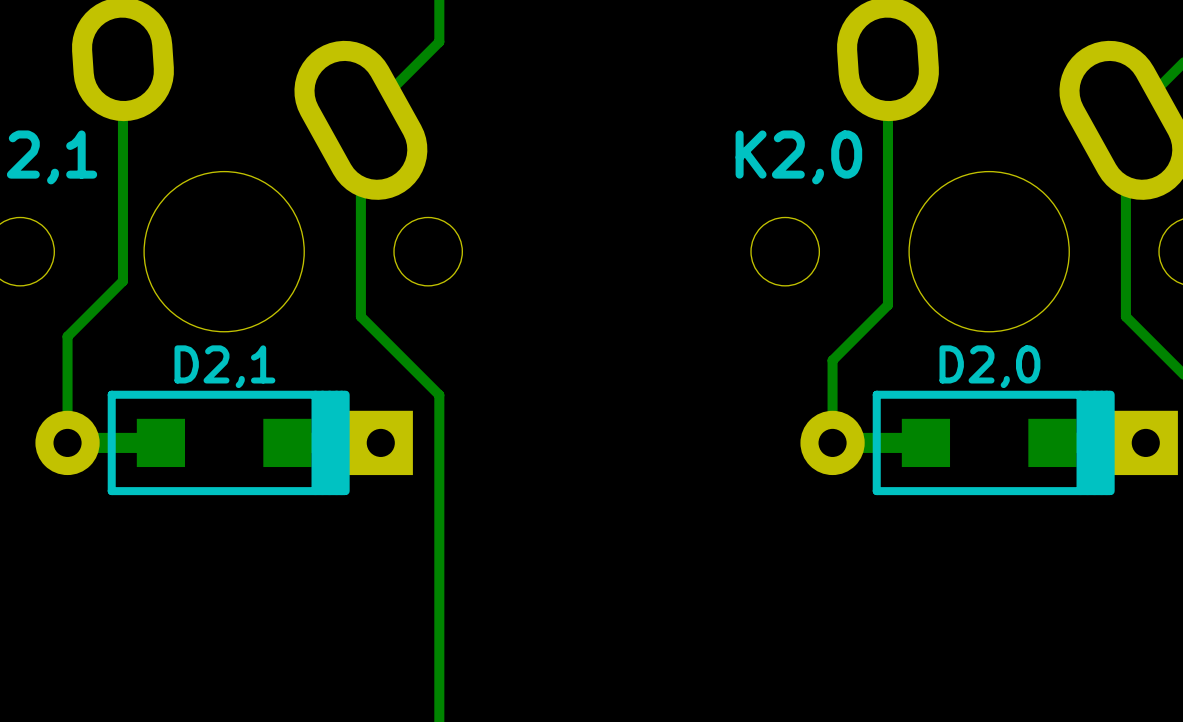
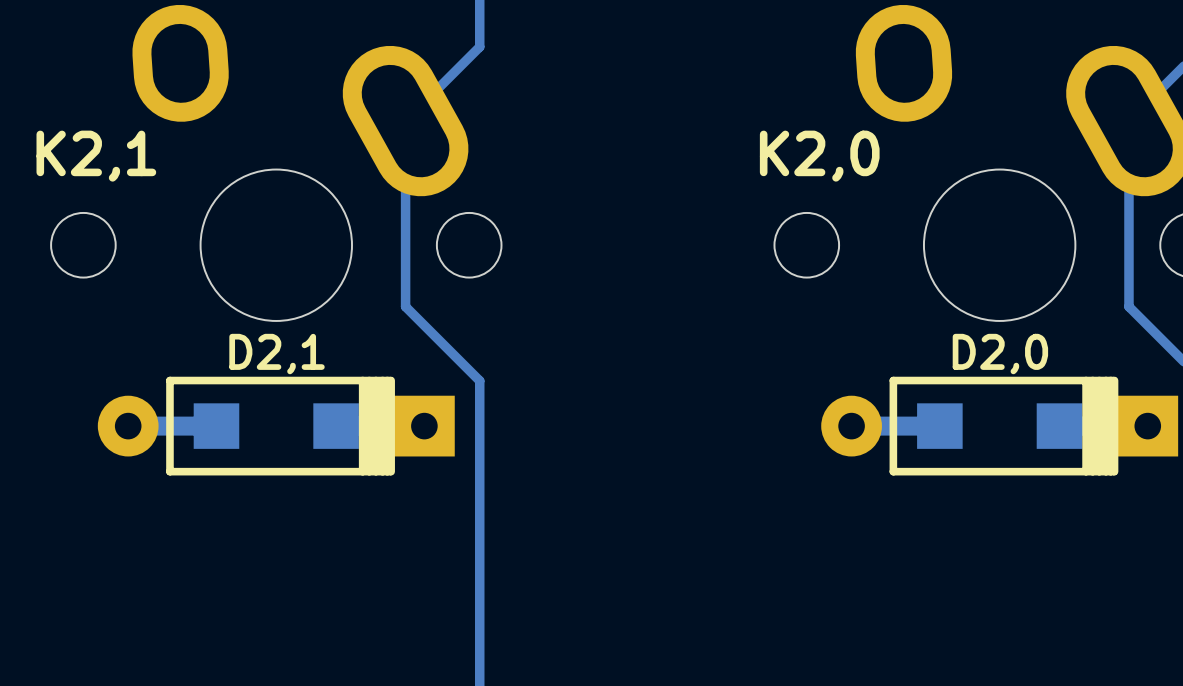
track: (122, 59) (122, 281) (67, 336) (67, 442) -> none
track: (887, 59) (887, 305) (832, 360) (832, 442) -> none

